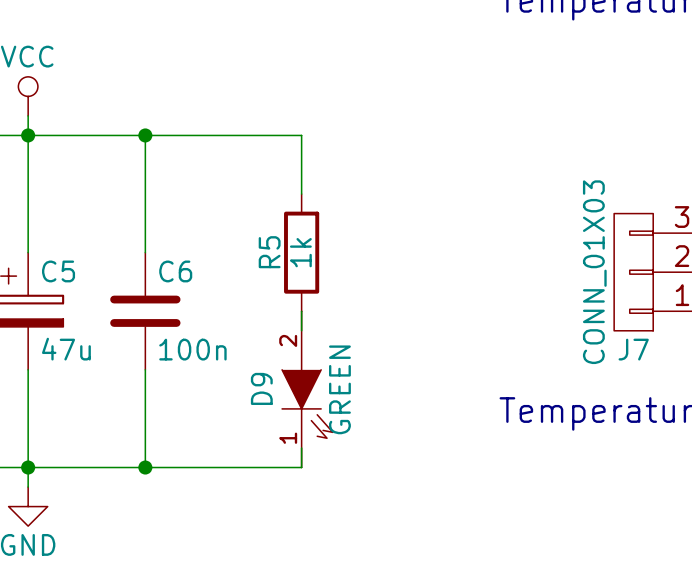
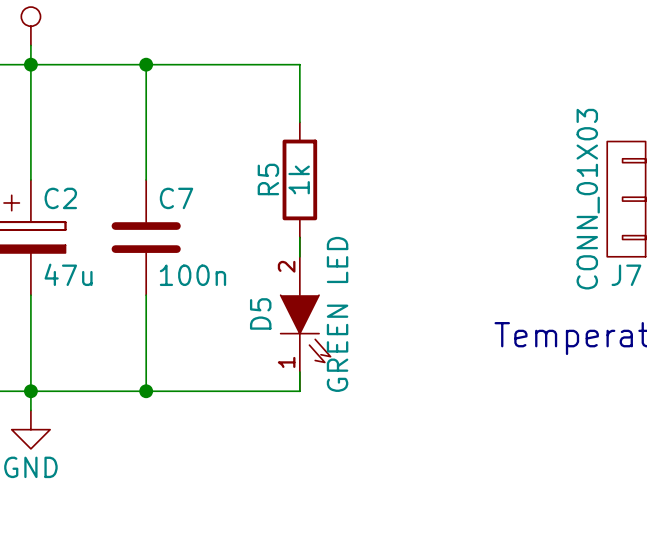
C5 name: C5 (58, 271) -> C2 (60, 198)
C6 name: C6 (175, 271) -> C7 (176, 198)
D9 name: D9 (261, 388) -> D5 (260, 313)
D9 value: GREEN (339, 389) -> GREEN LED (337, 314)

